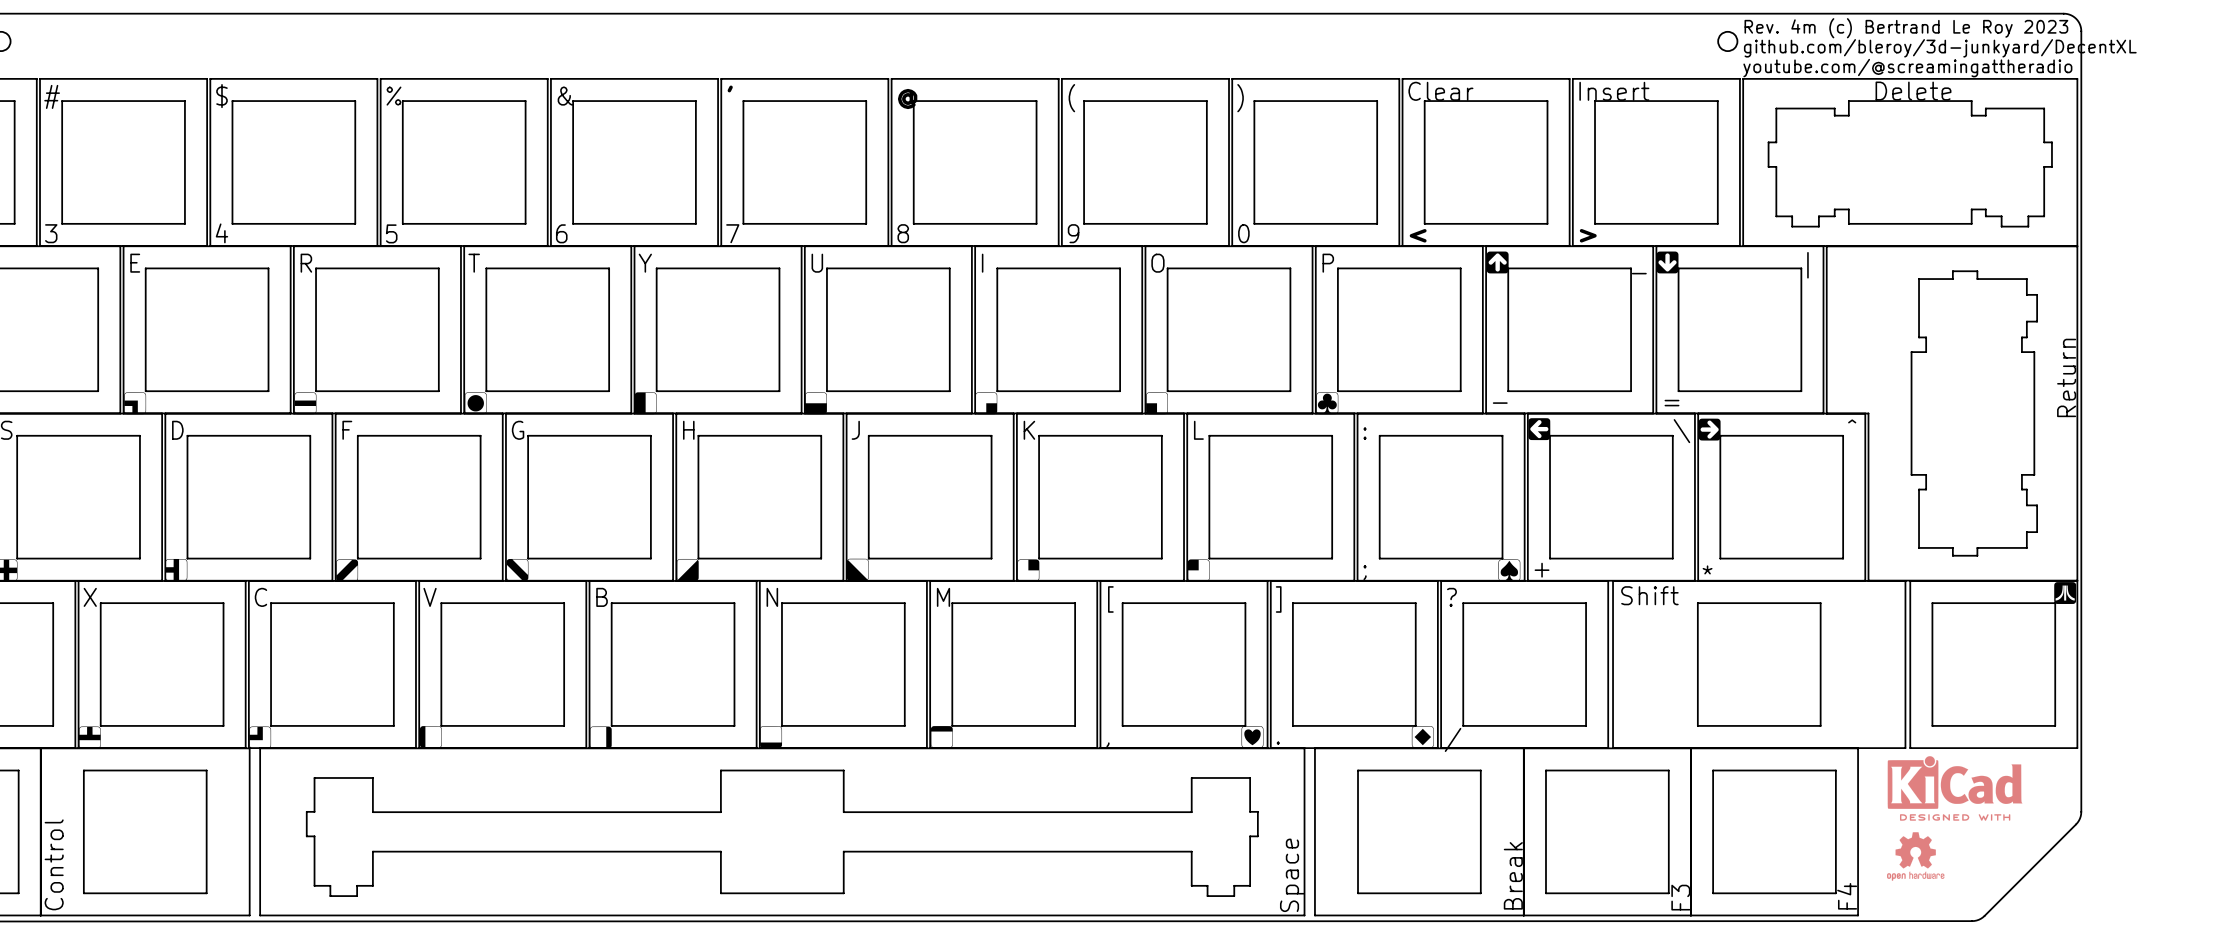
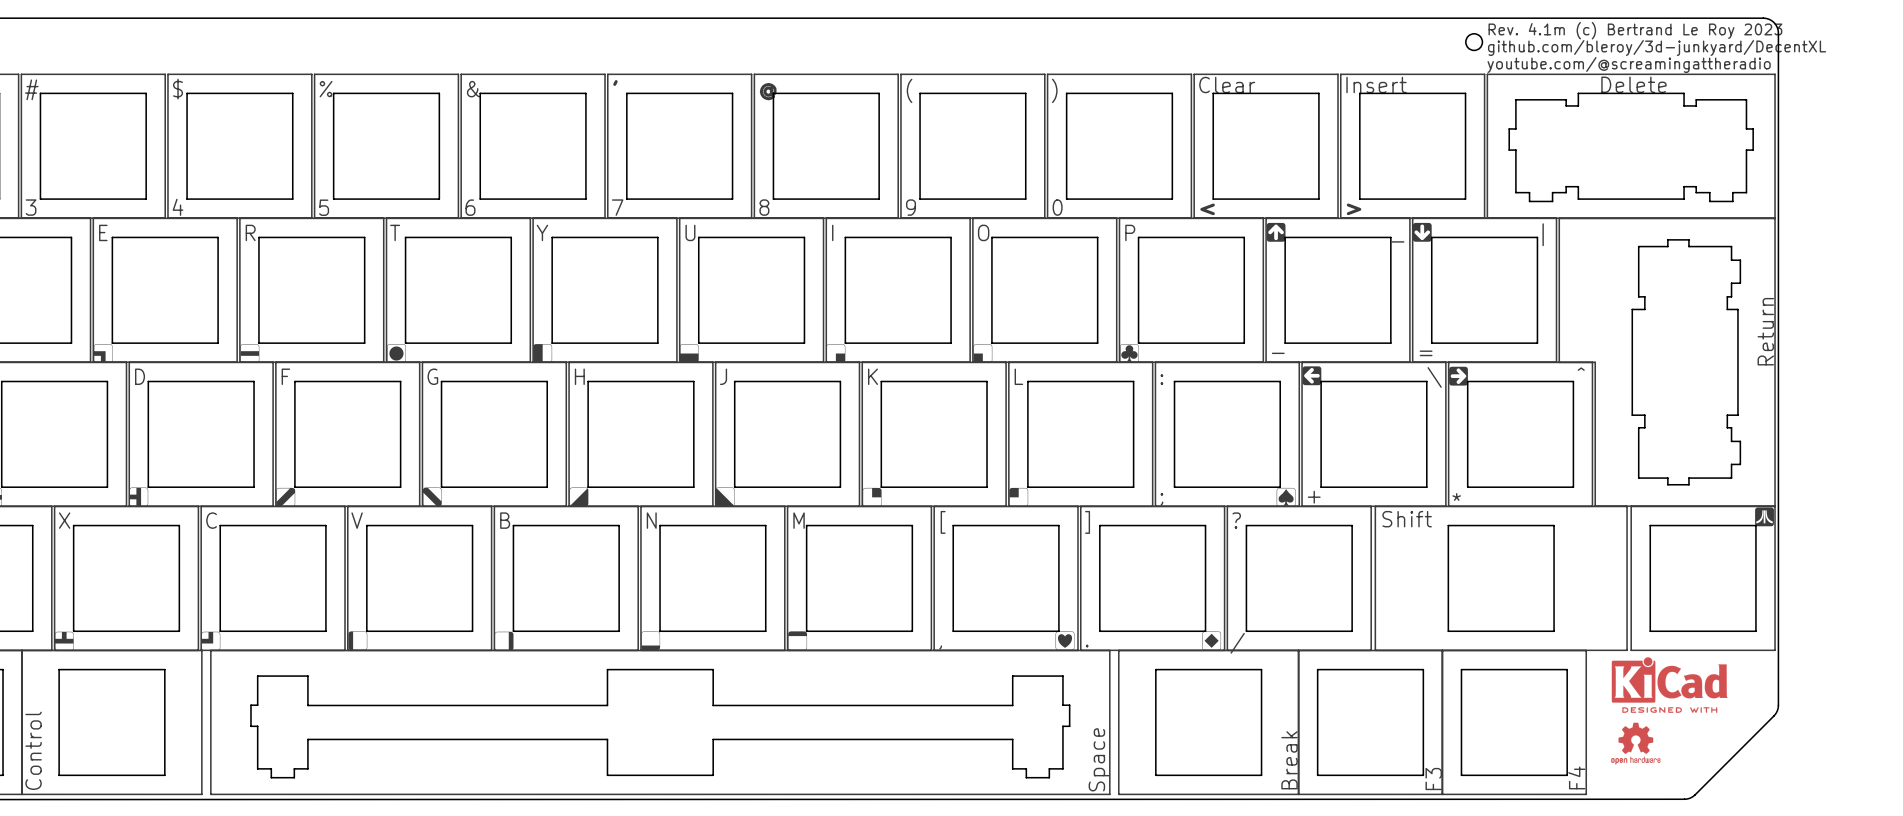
text: Rev. 4m (c) Bertrand Le Roy 2023 (1906, 28) -> Rev. 4.1m (c) Bertrand Le Roy 2023 (1635, 30)

